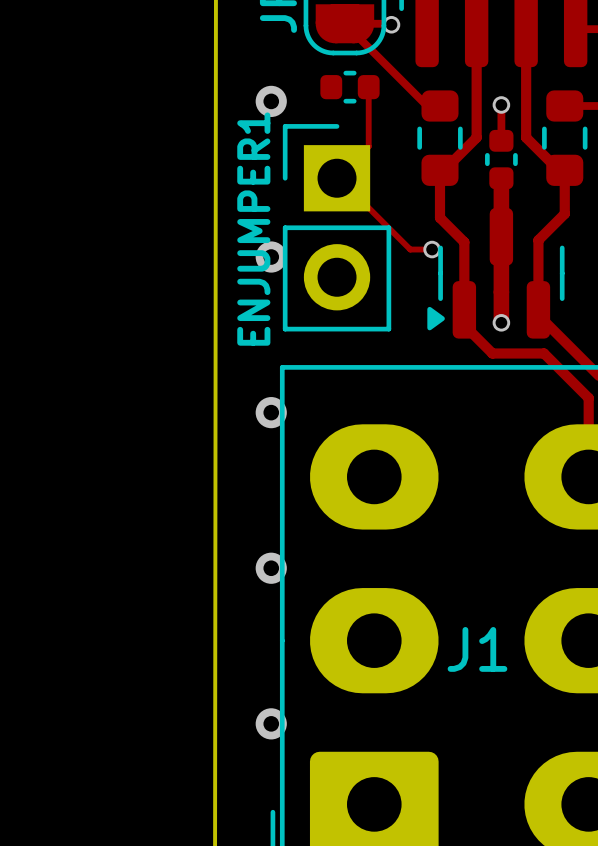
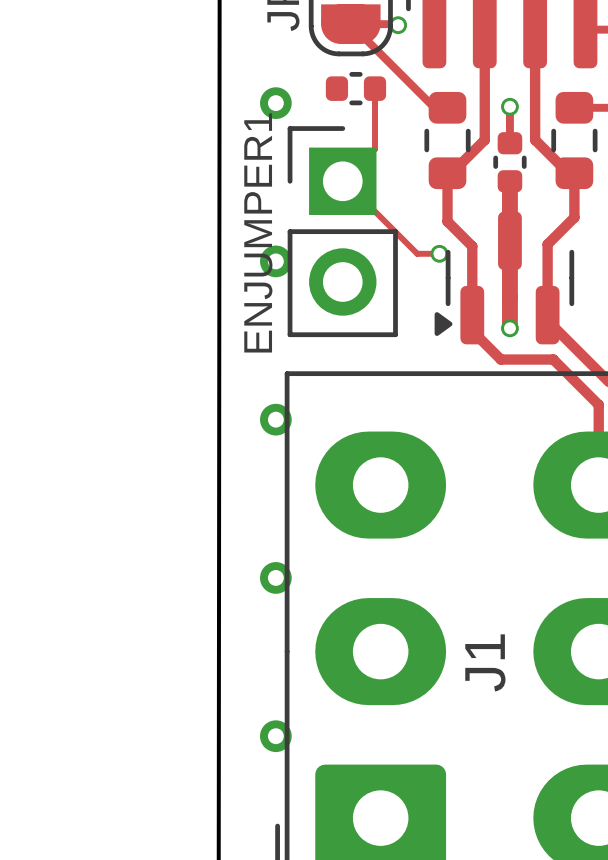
J1 name rotation: 0° (477, 649) -> 90° counterclockwise (485, 662)

